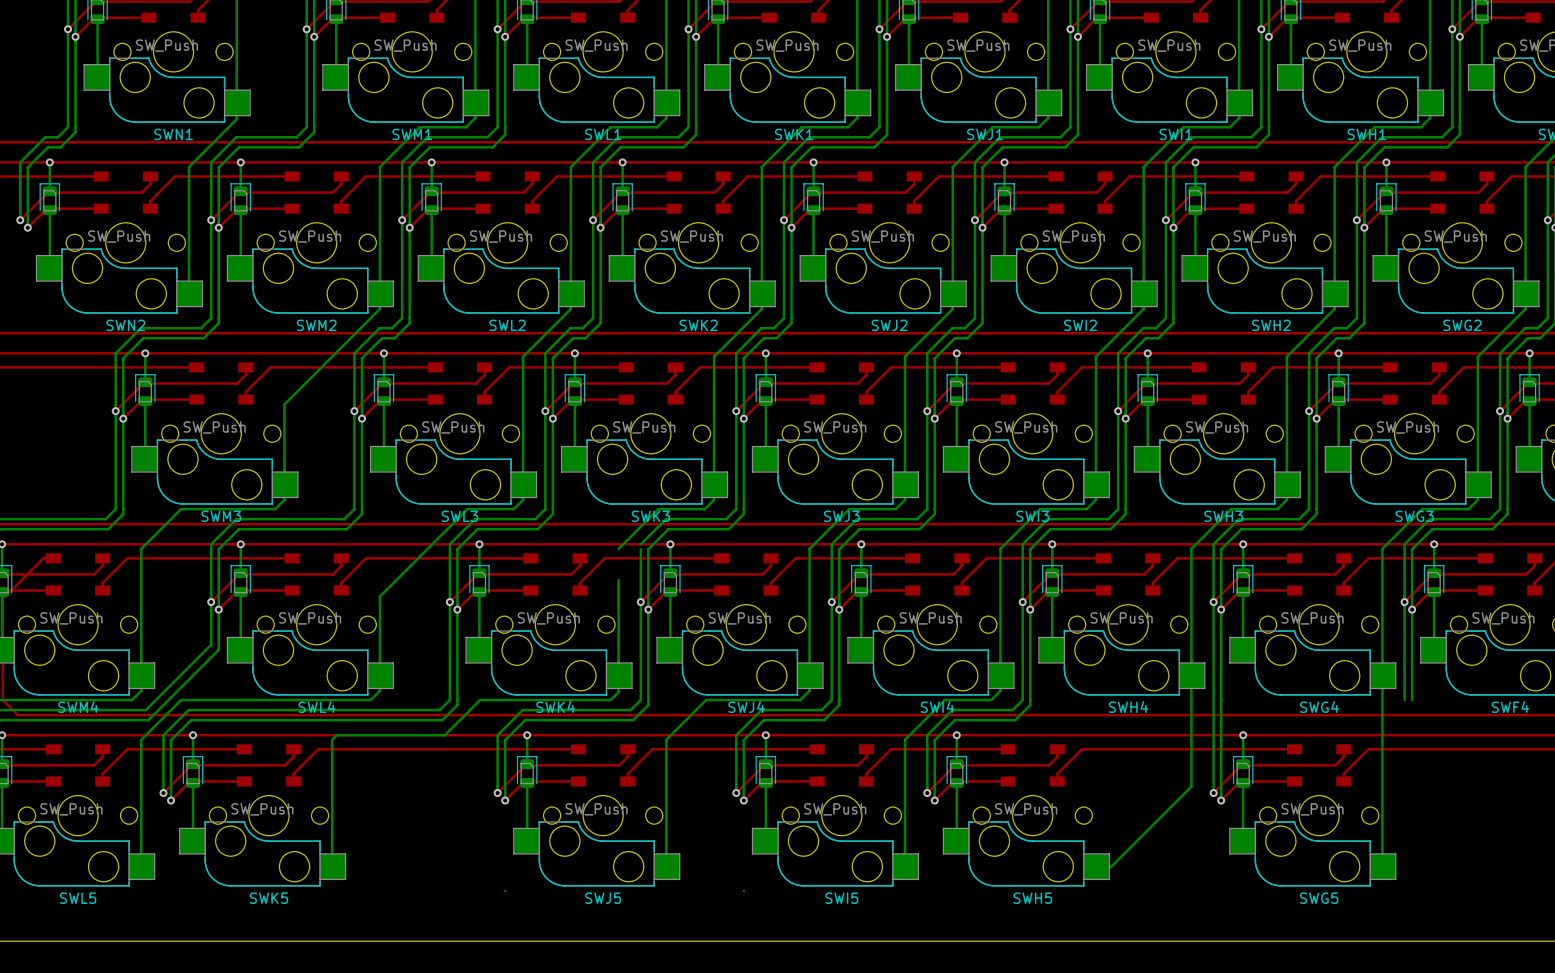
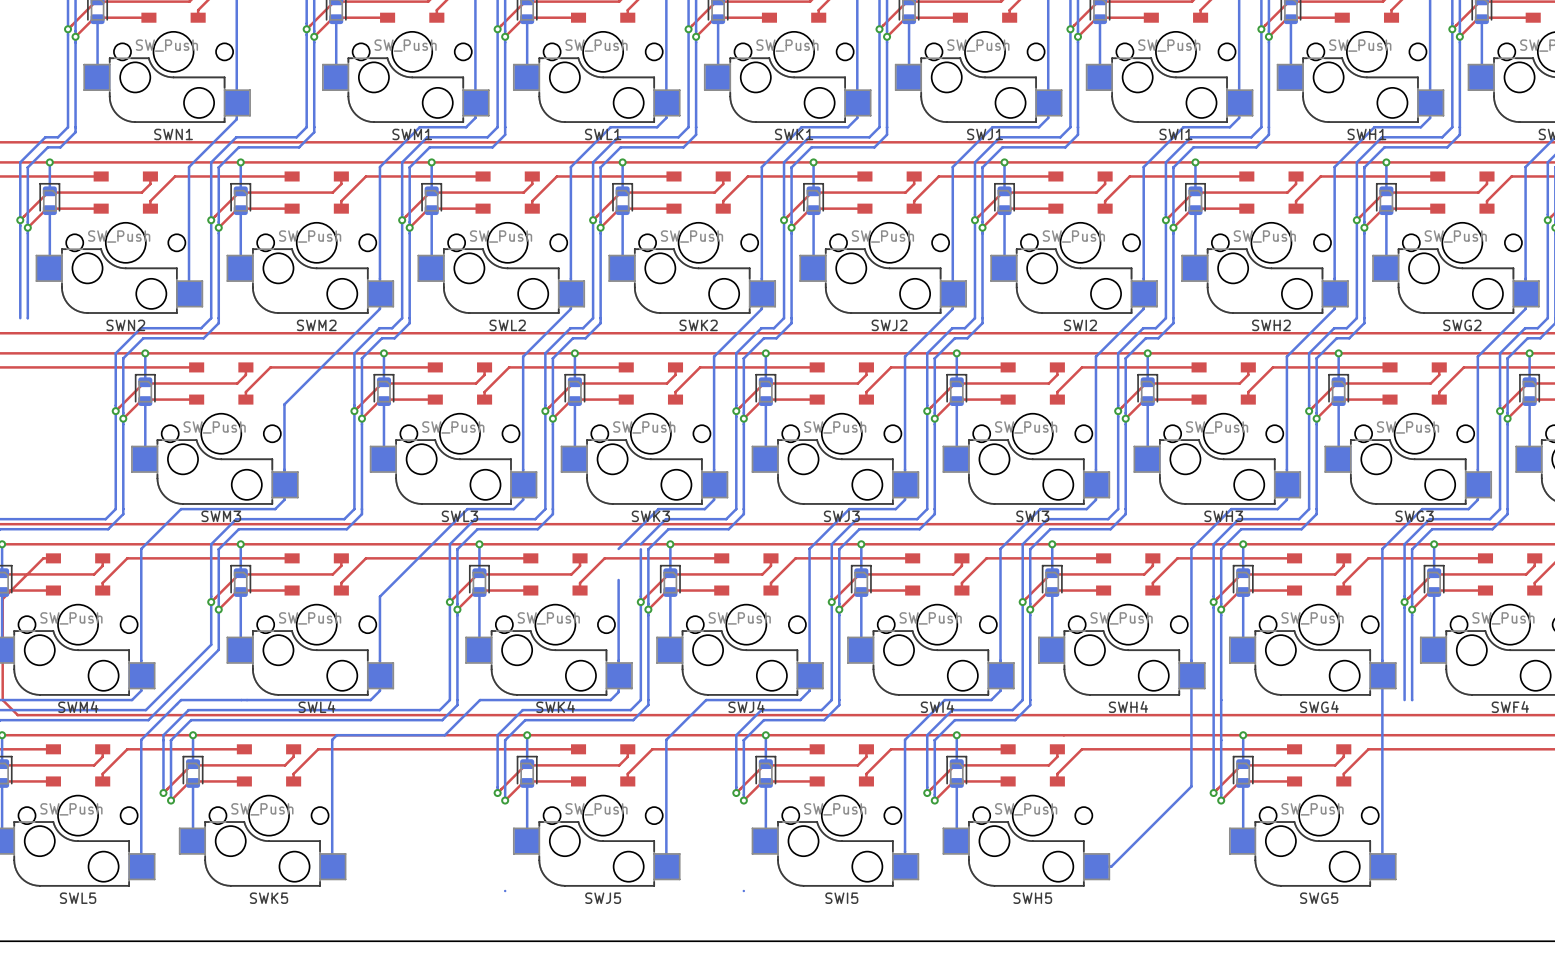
bottom track: none -> (20, 220) (20, 318)
bottom track: none -> (27, 227) (27, 318)

